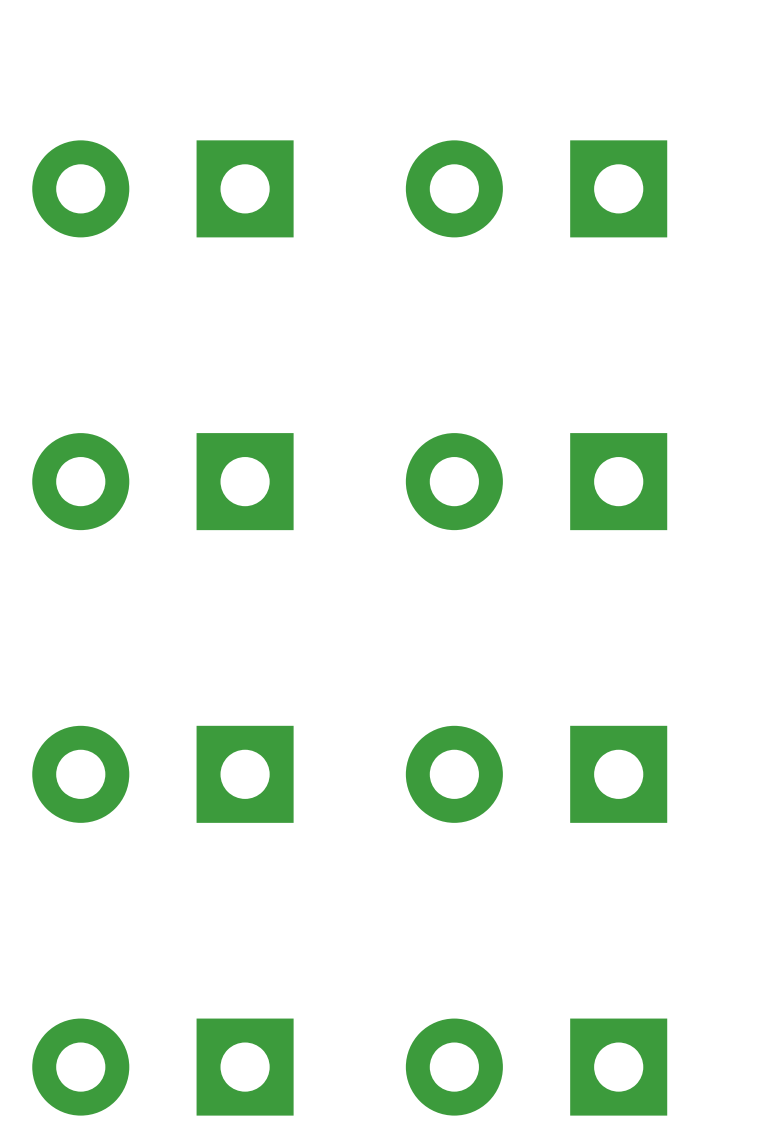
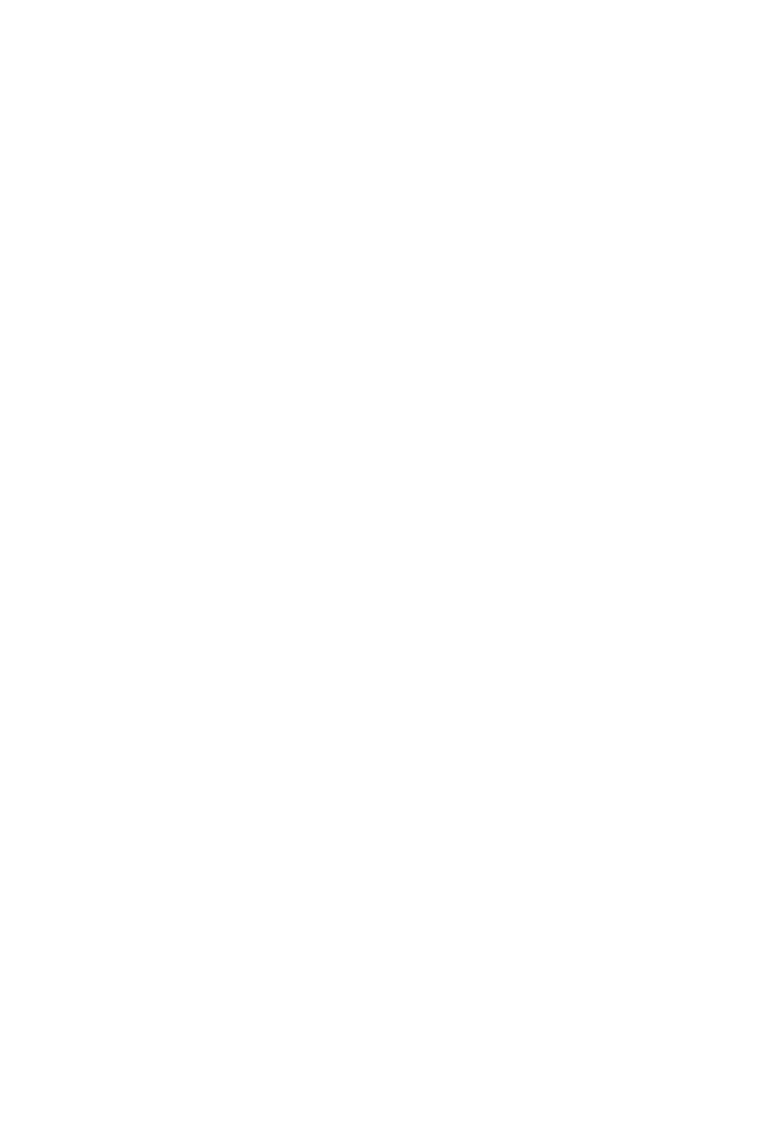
part: (162, 188) -> none
part: (536, 188) -> none
part: (162, 481) -> none
part: (536, 481) -> none
part: (162, 774) -> none
part: (536, 774) -> none
part: (162, 1067) -> none
part: (536, 1067) -> none

